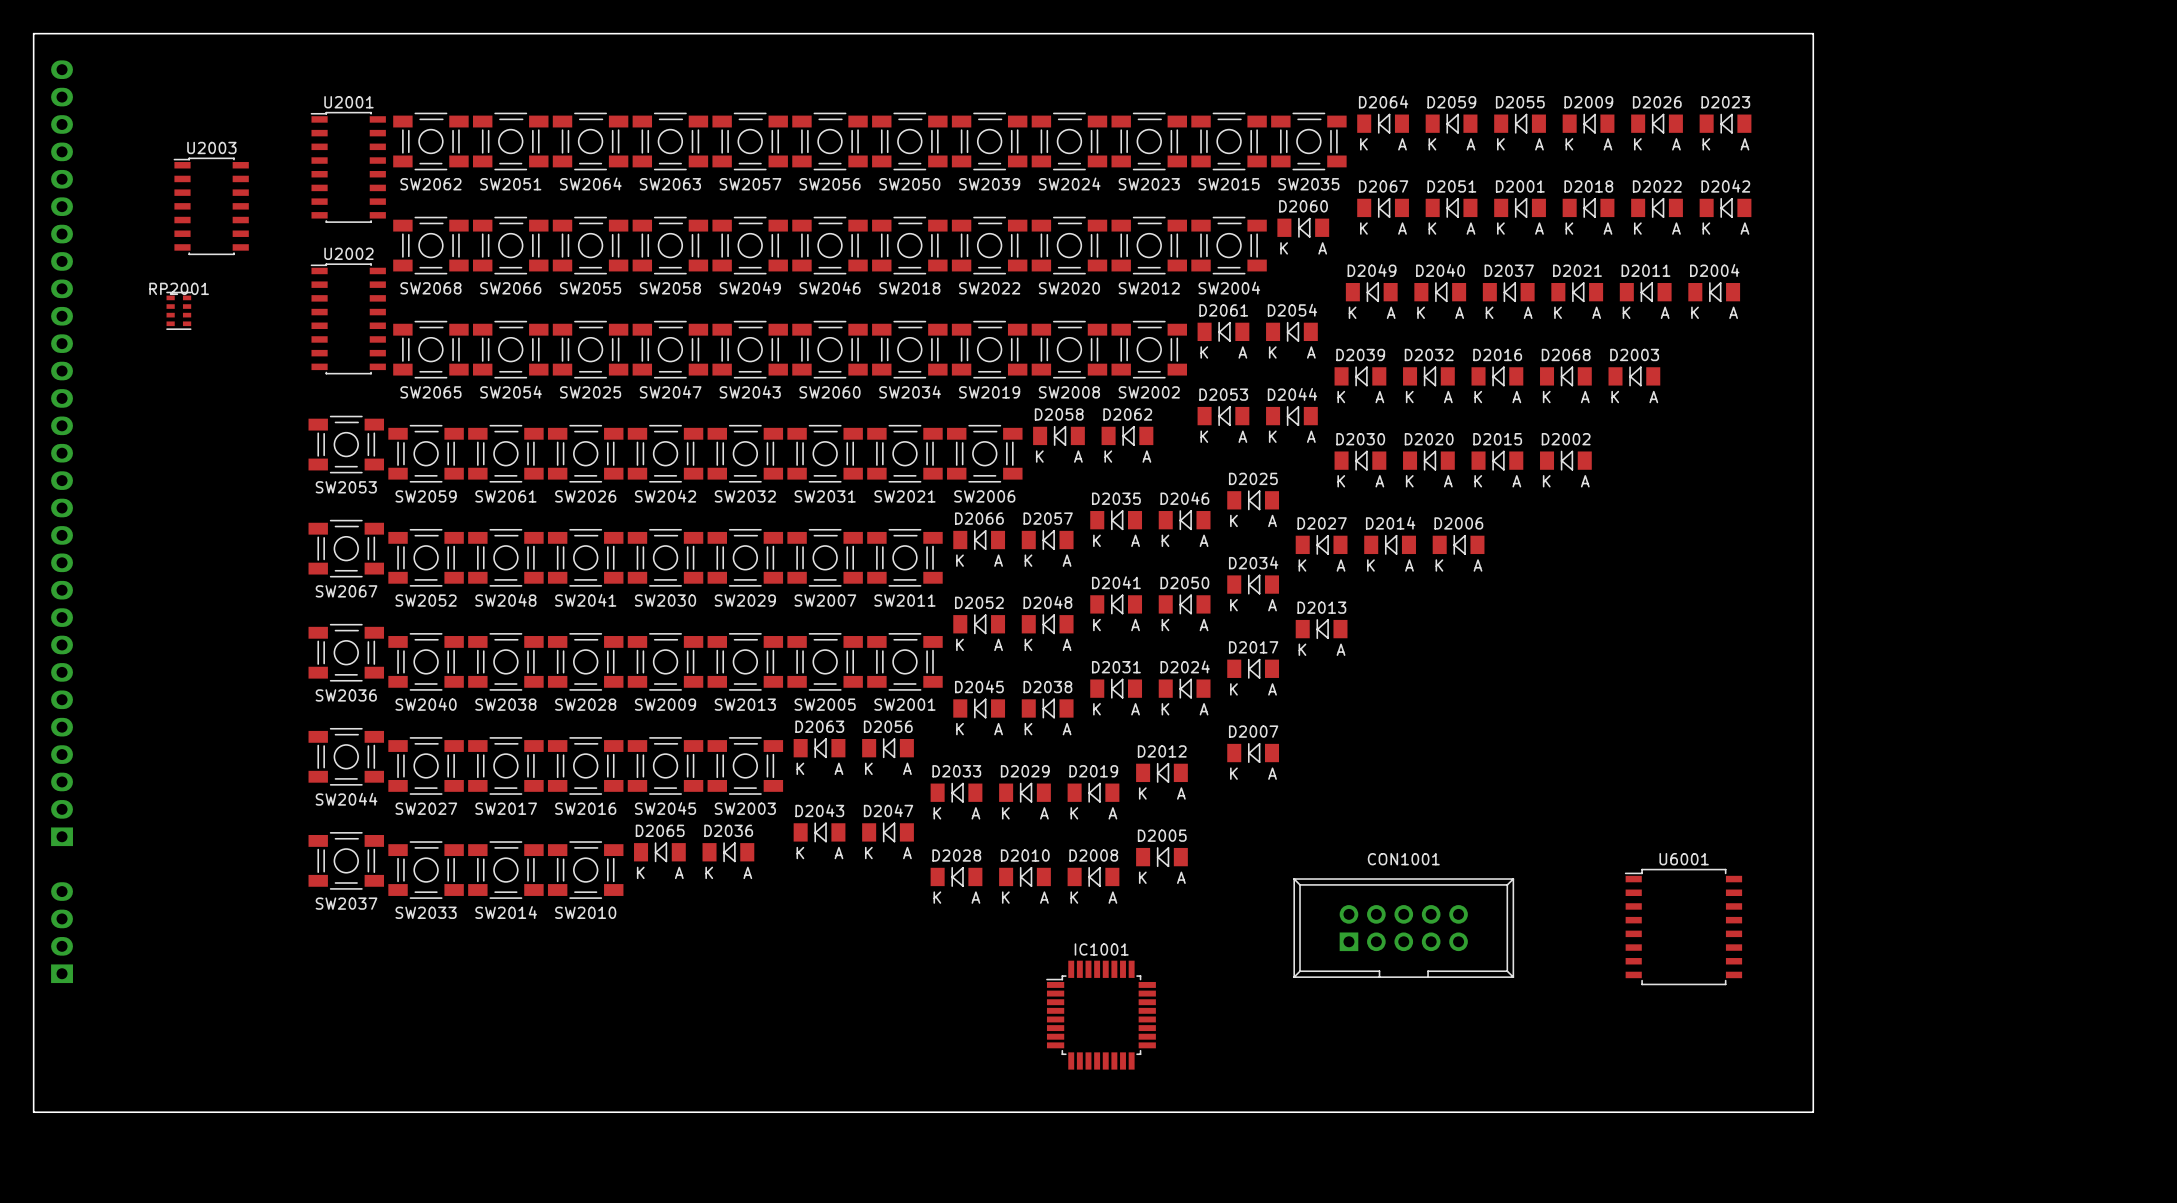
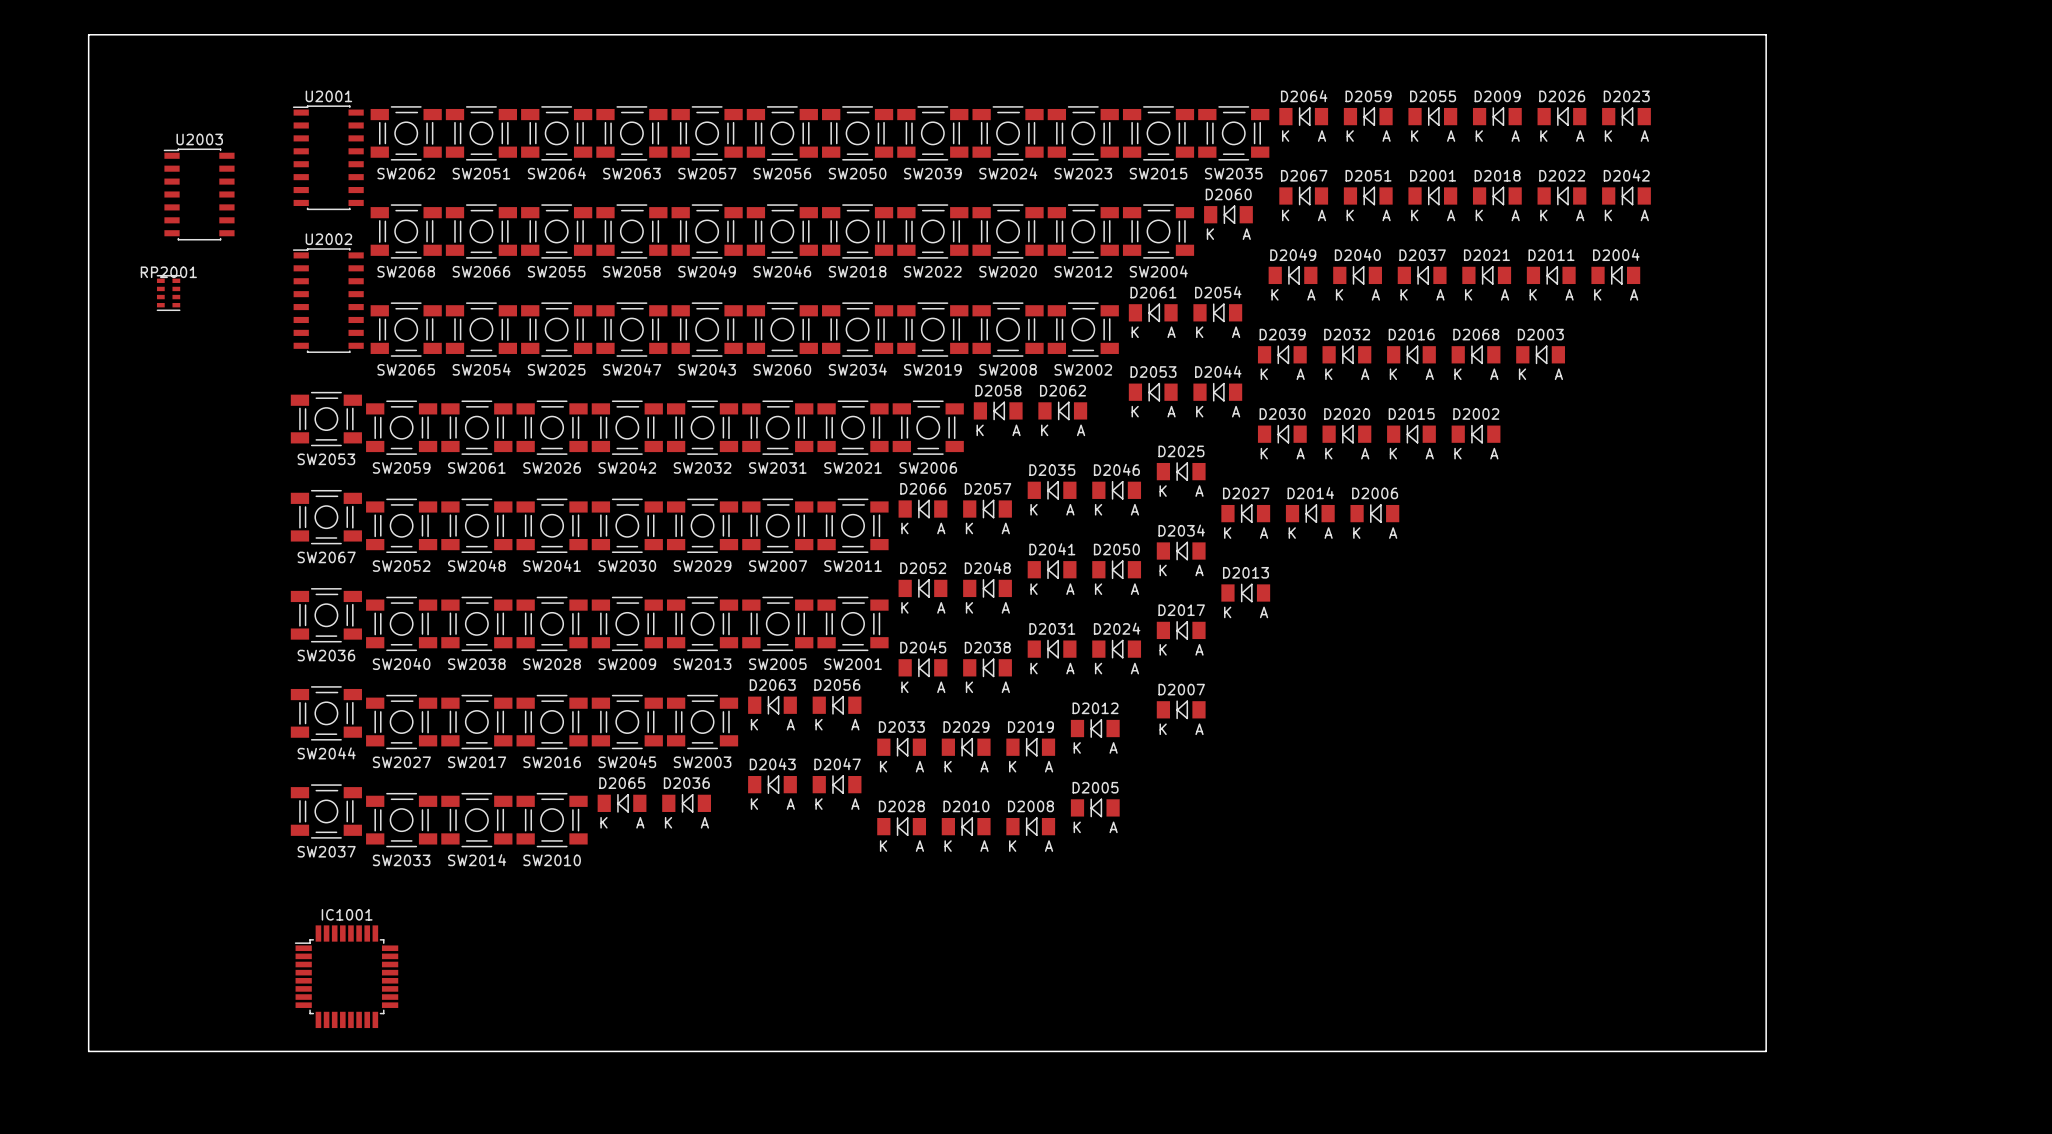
board edge: (33, 33) (33, 1112) (1813, 1112) (1813, 33) (33, 33) -> (88, 34) (88, 1051) (1766, 1051) (1766, 34) (88, 34)
part: (62, 453) -> none
U6001: (1683, 927) -> none
CON1001: (1403, 928) -> none
part: (62, 932) -> none
IC1001 position: (1101, 1015) -> (346, 976)

